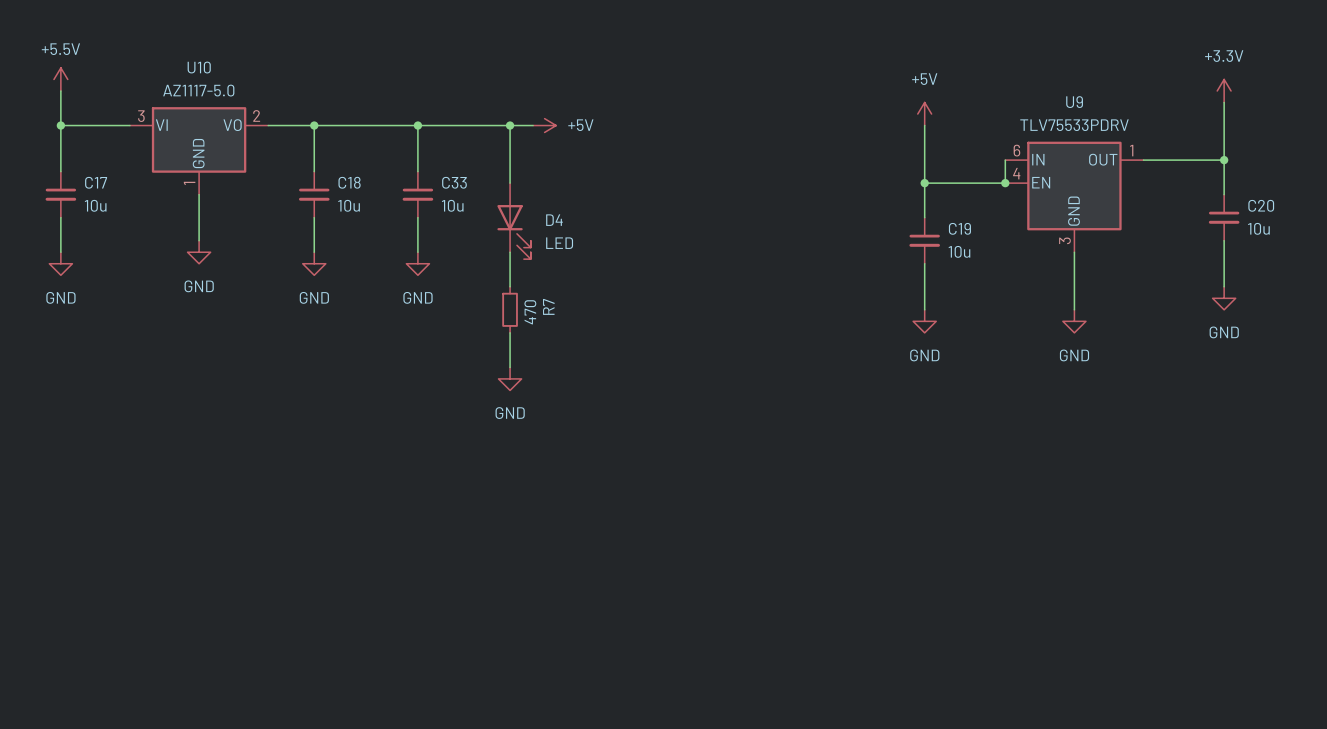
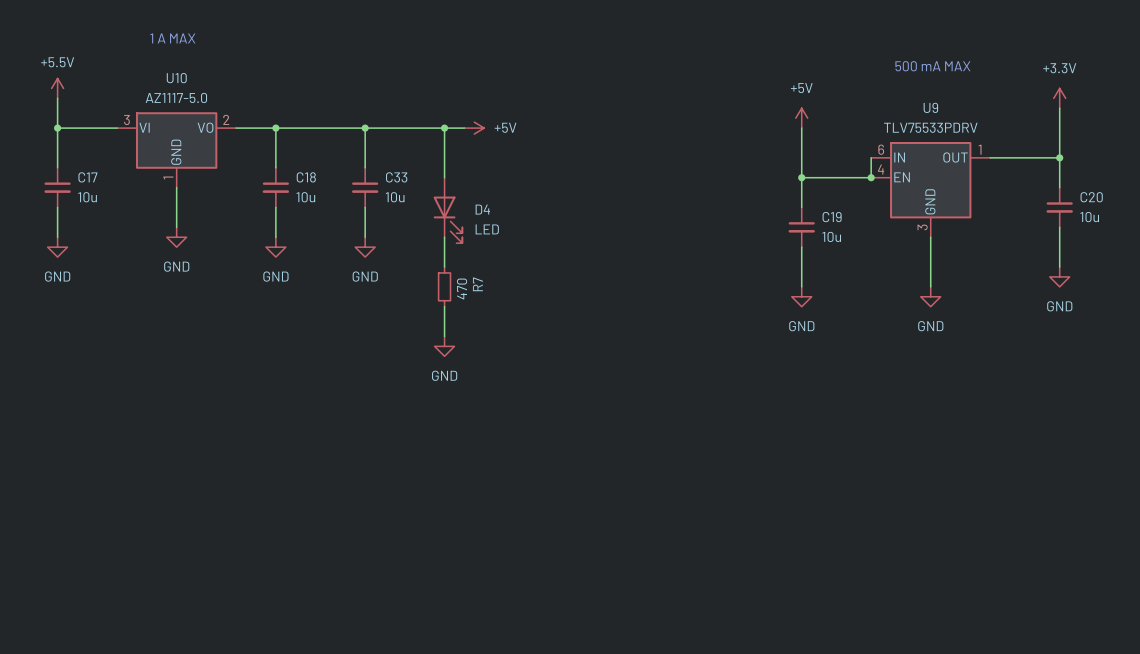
text: none -> 1 A MAX (172, 38)
text: none -> 500 mA MAX (932, 66)

